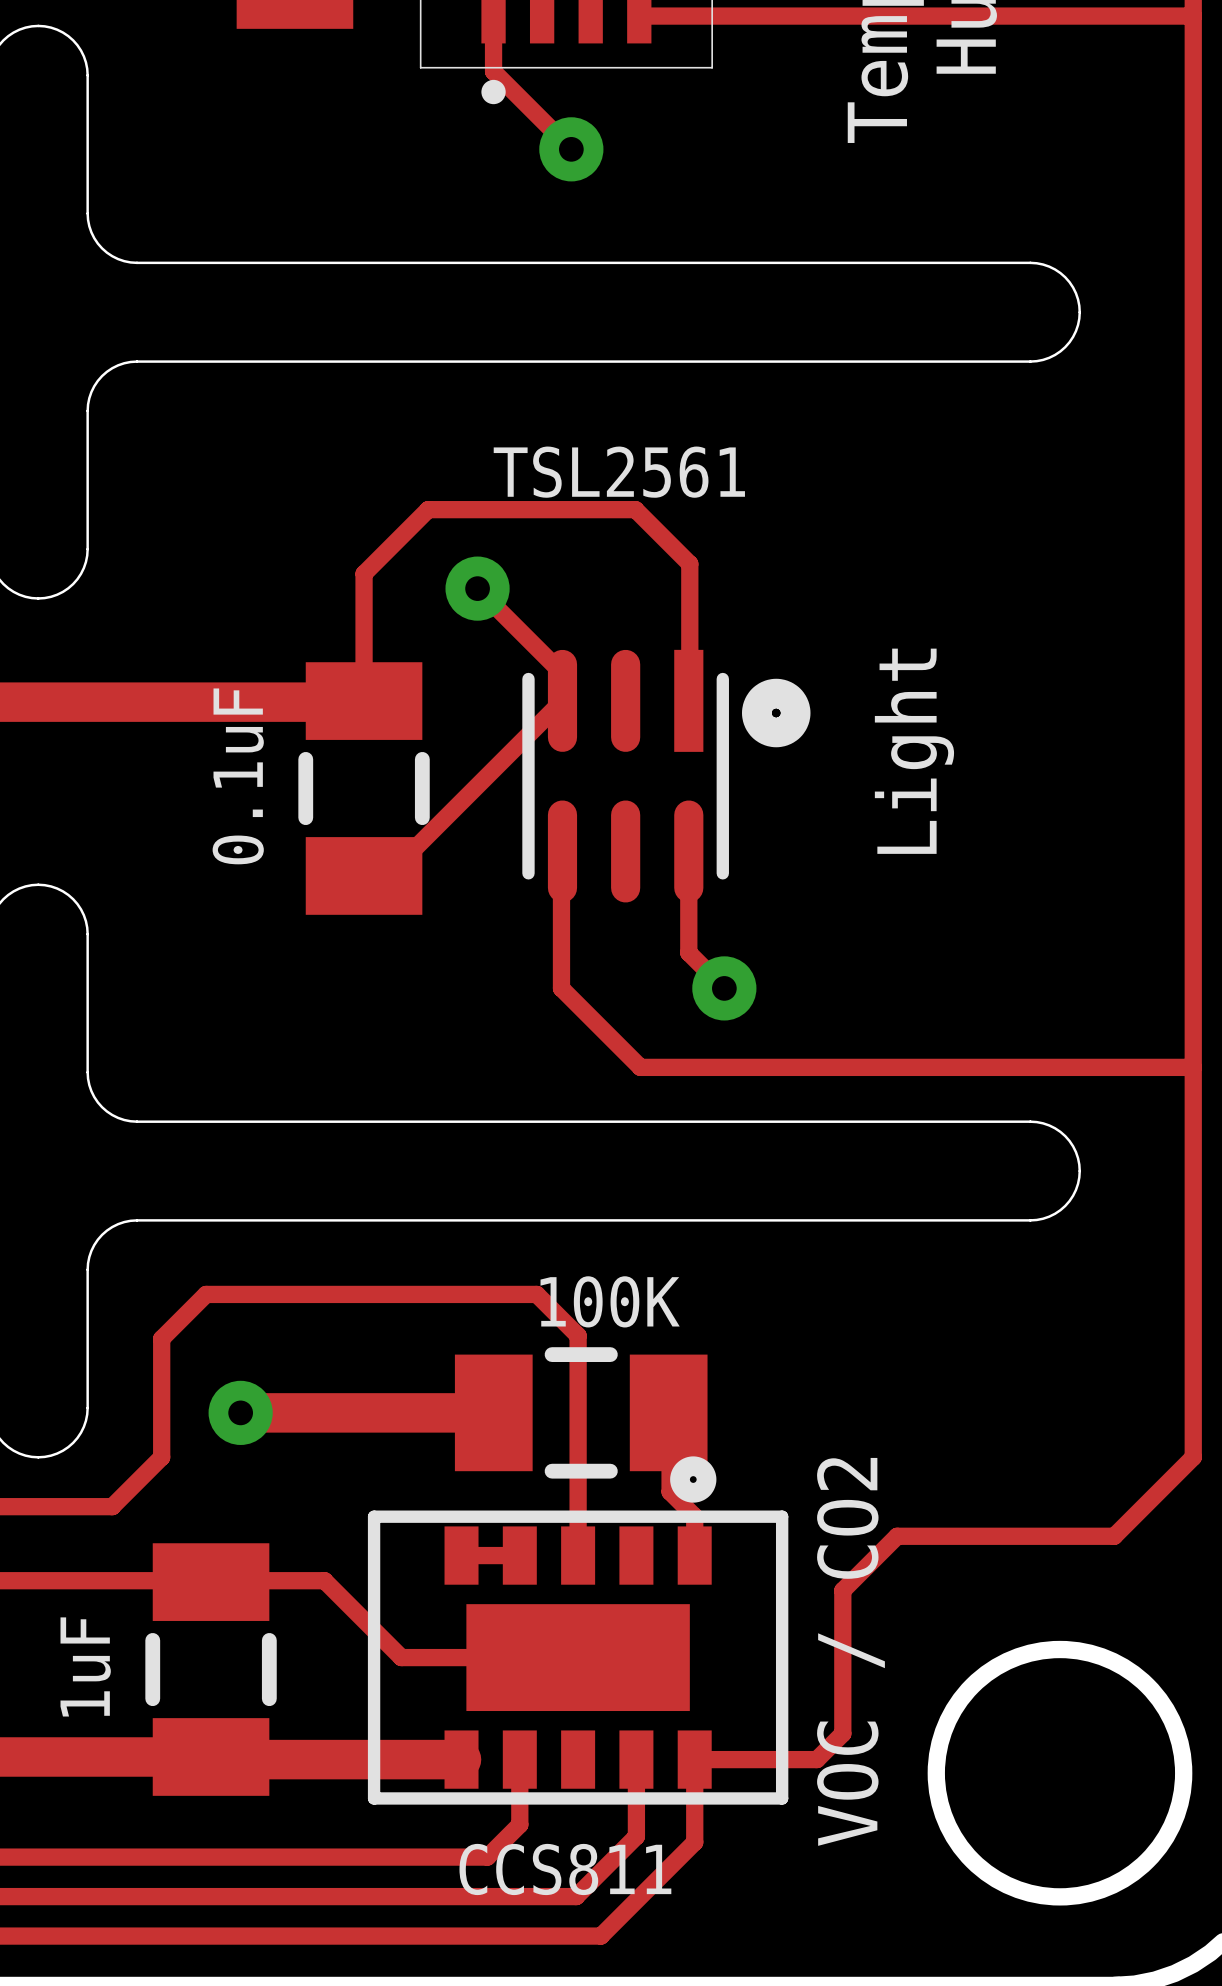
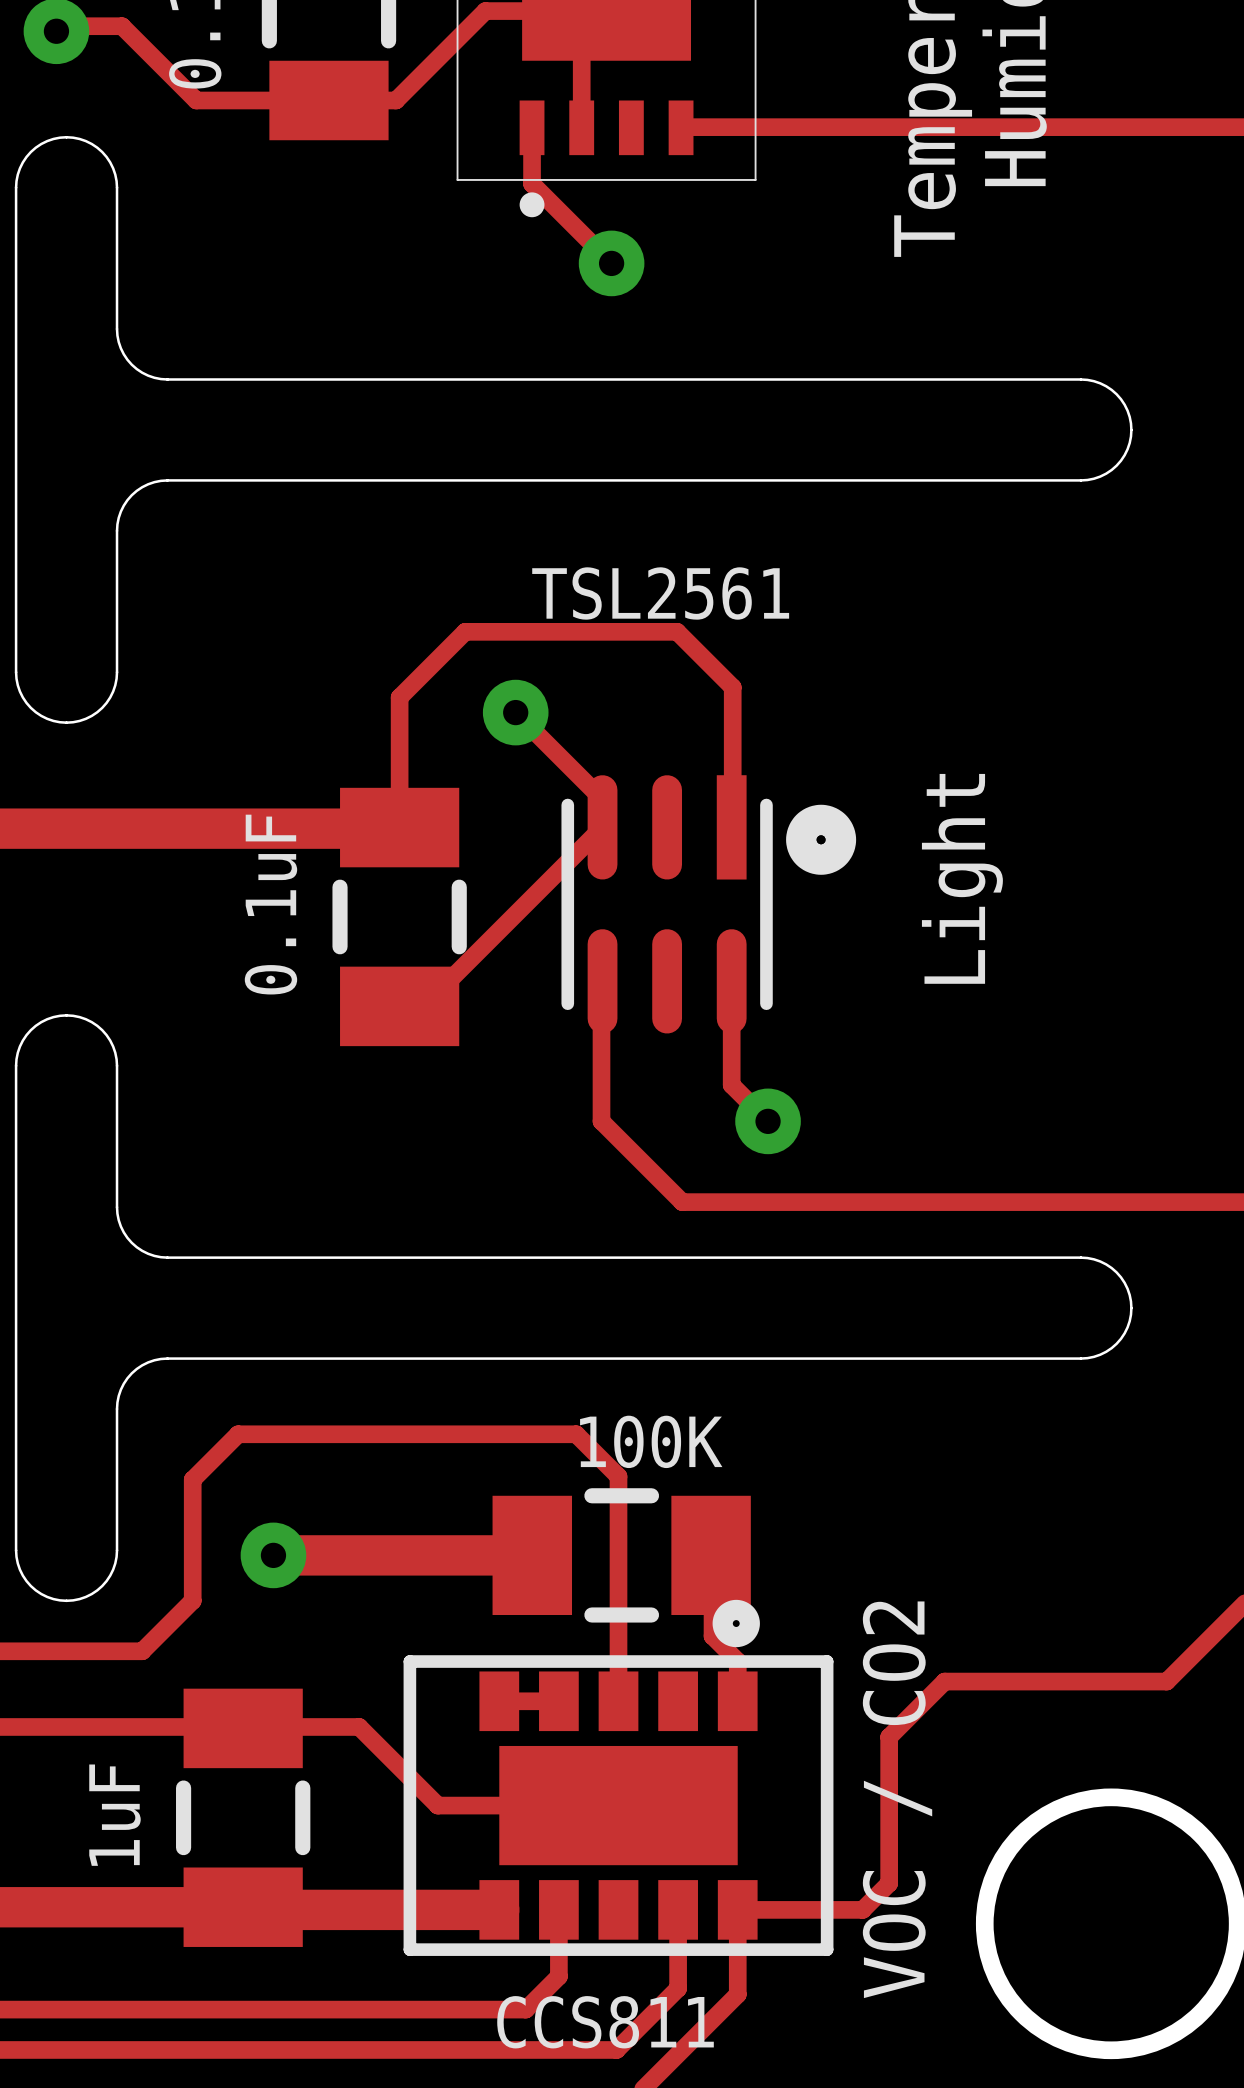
part footprint: [367, 1456, 789, 1805] -> [403, 1599, 834, 1956]

